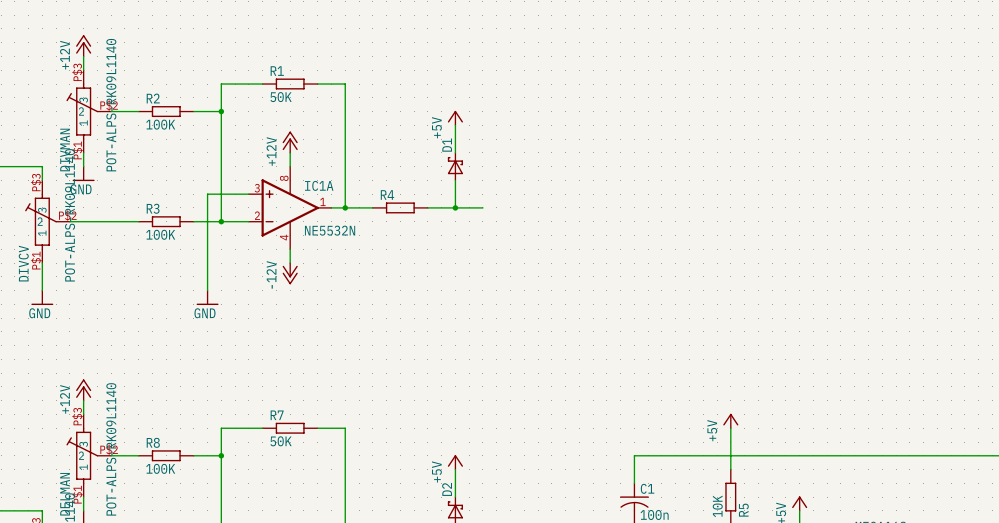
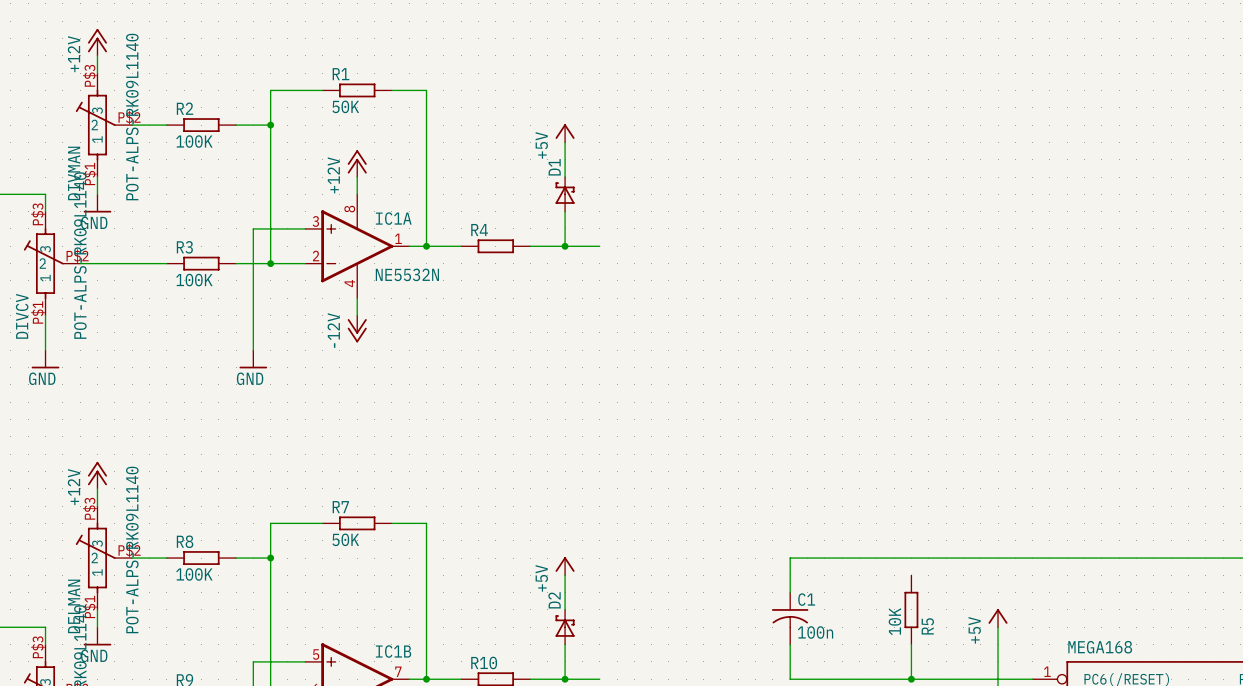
power symbol: +5V (730, 421) -> none
wire: (730, 428) (730, 469) -> none

